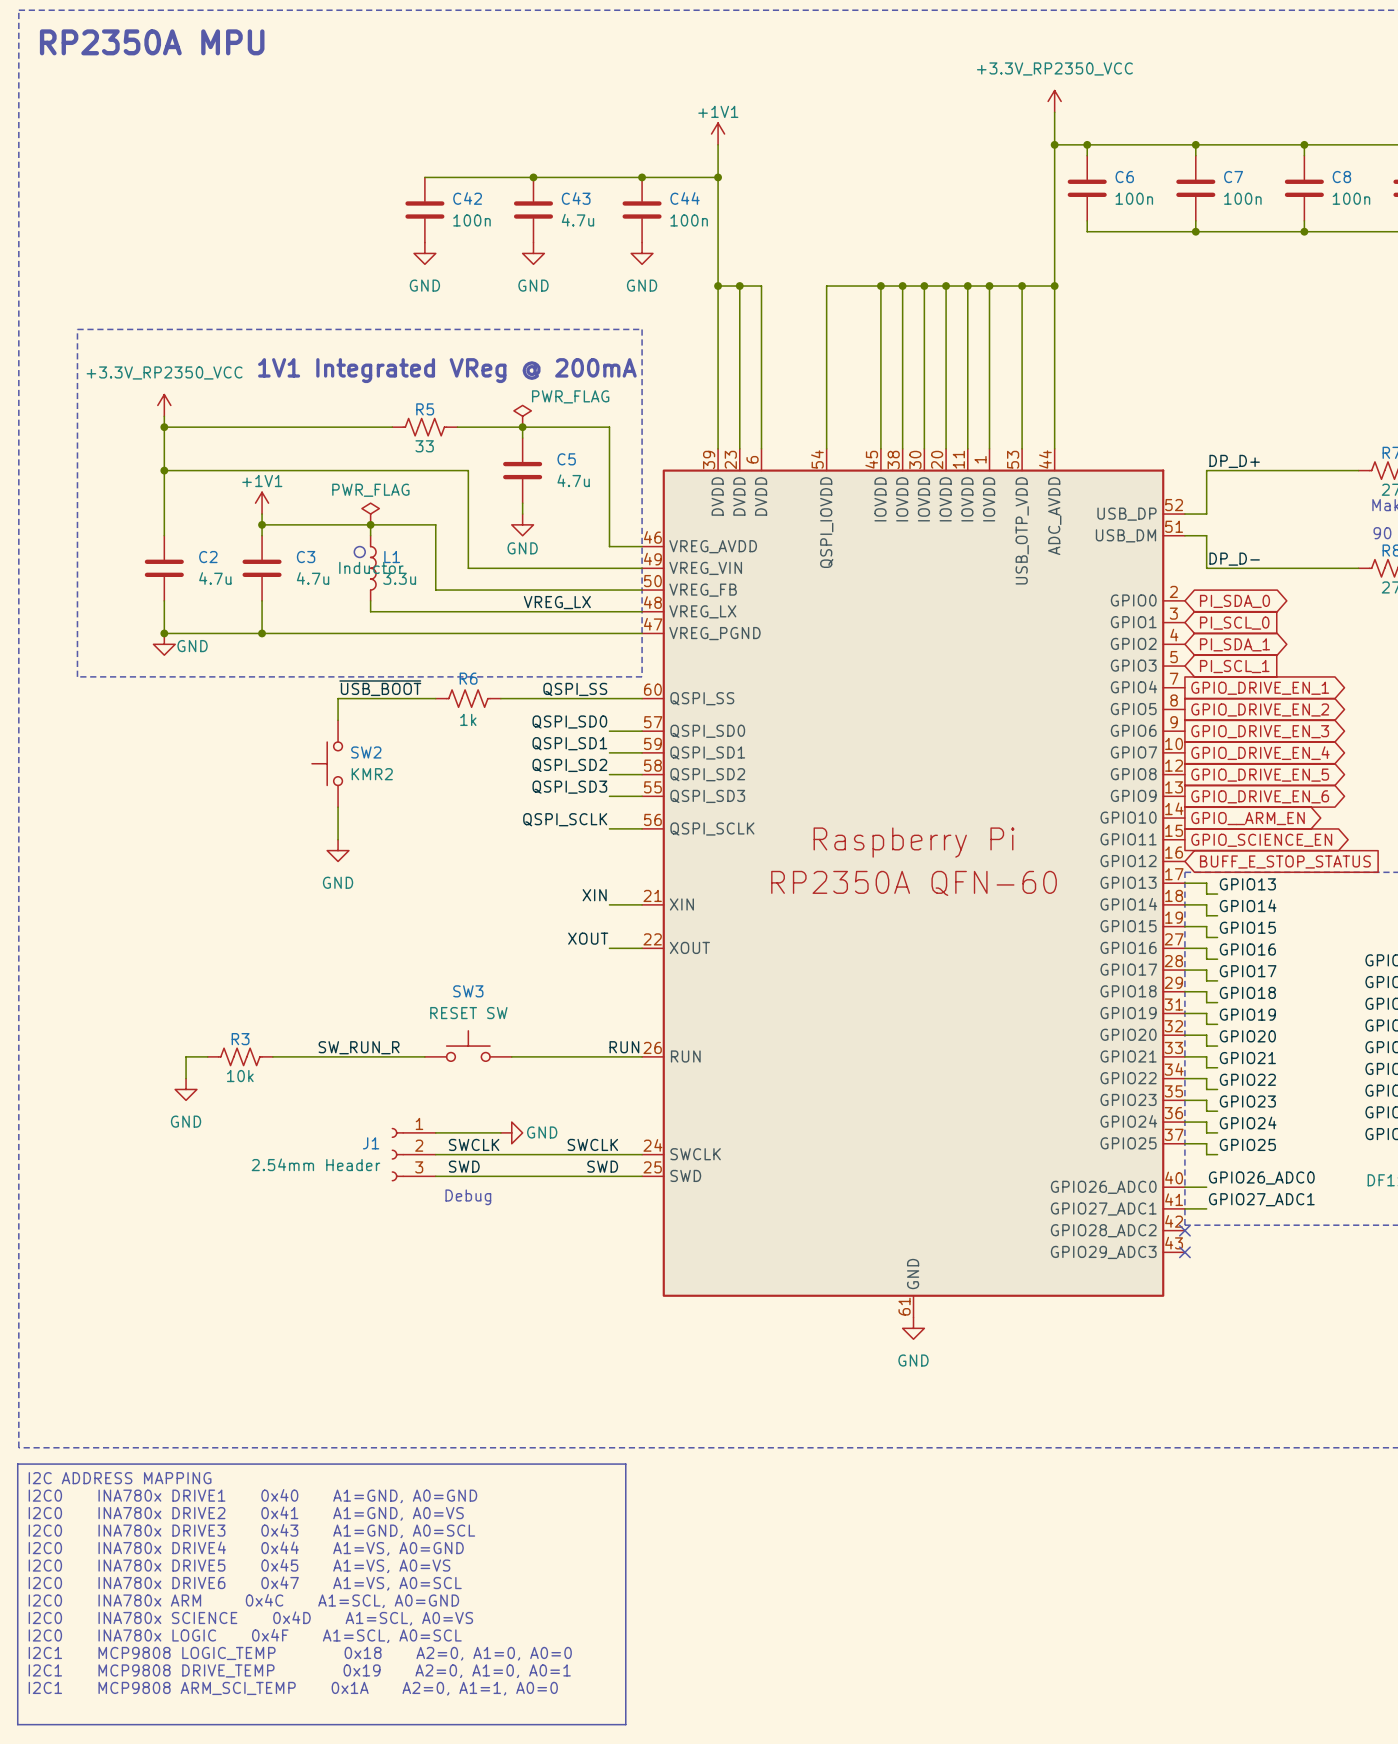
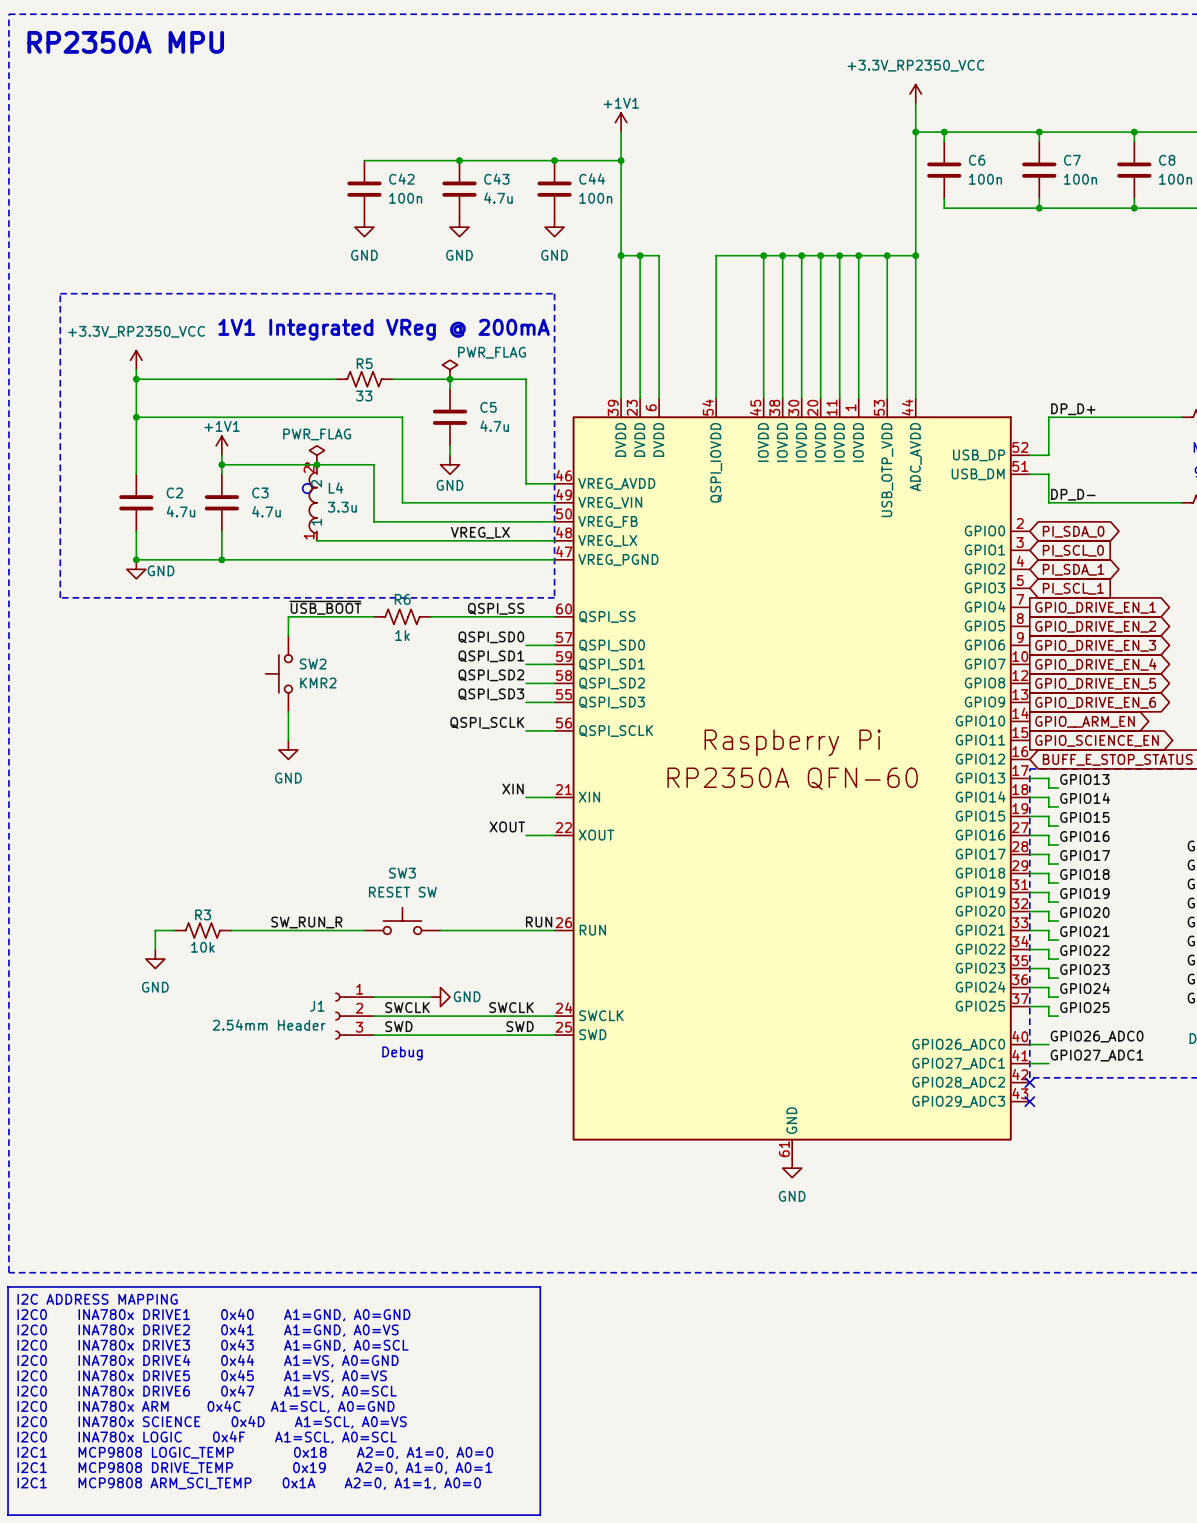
L4: none -> 3.3u (311, 501)
L1: 3.3u (373, 568) -> none

